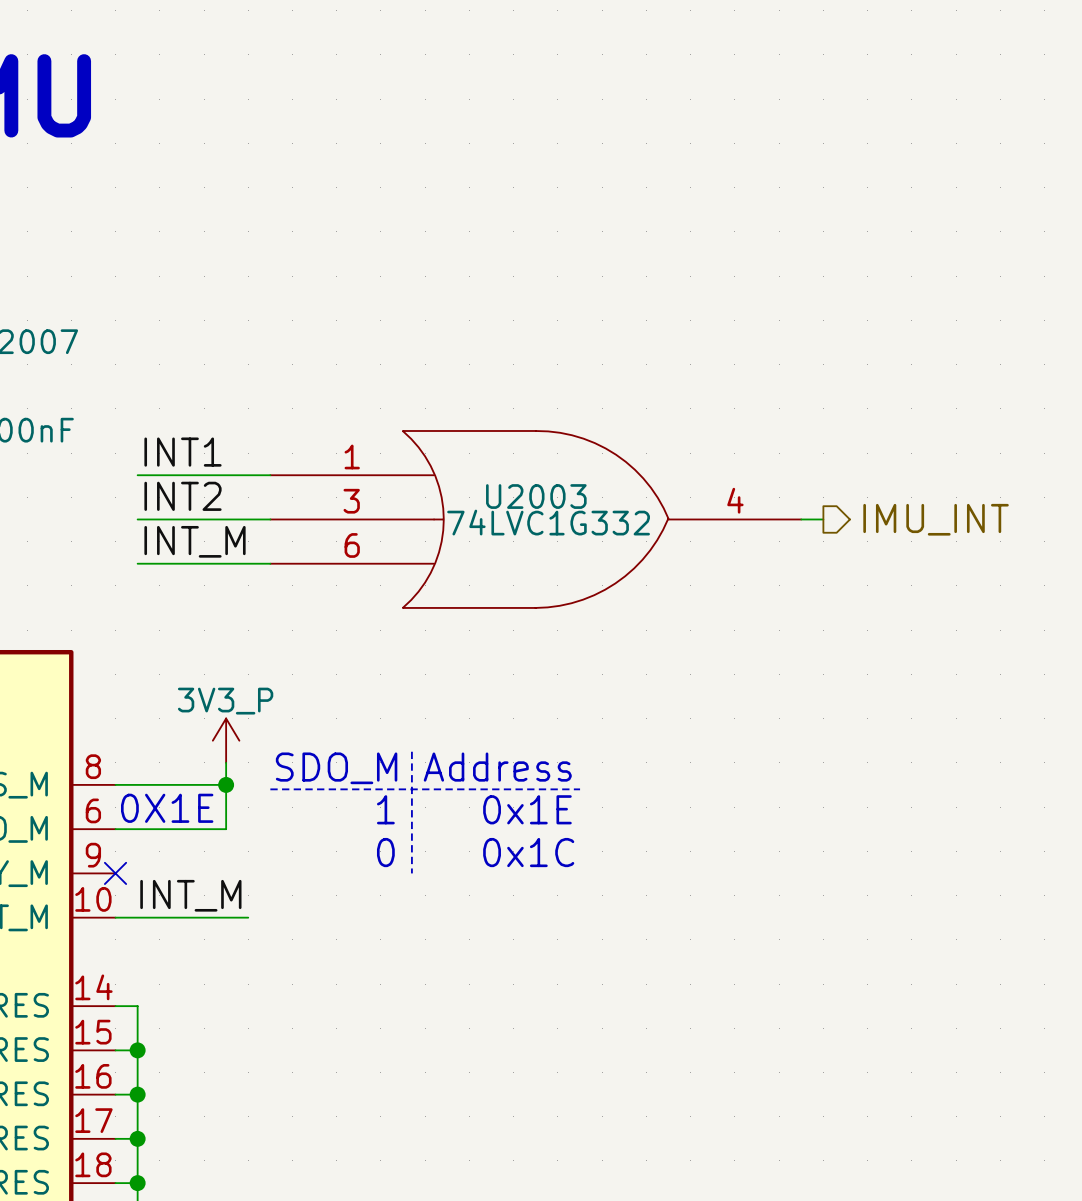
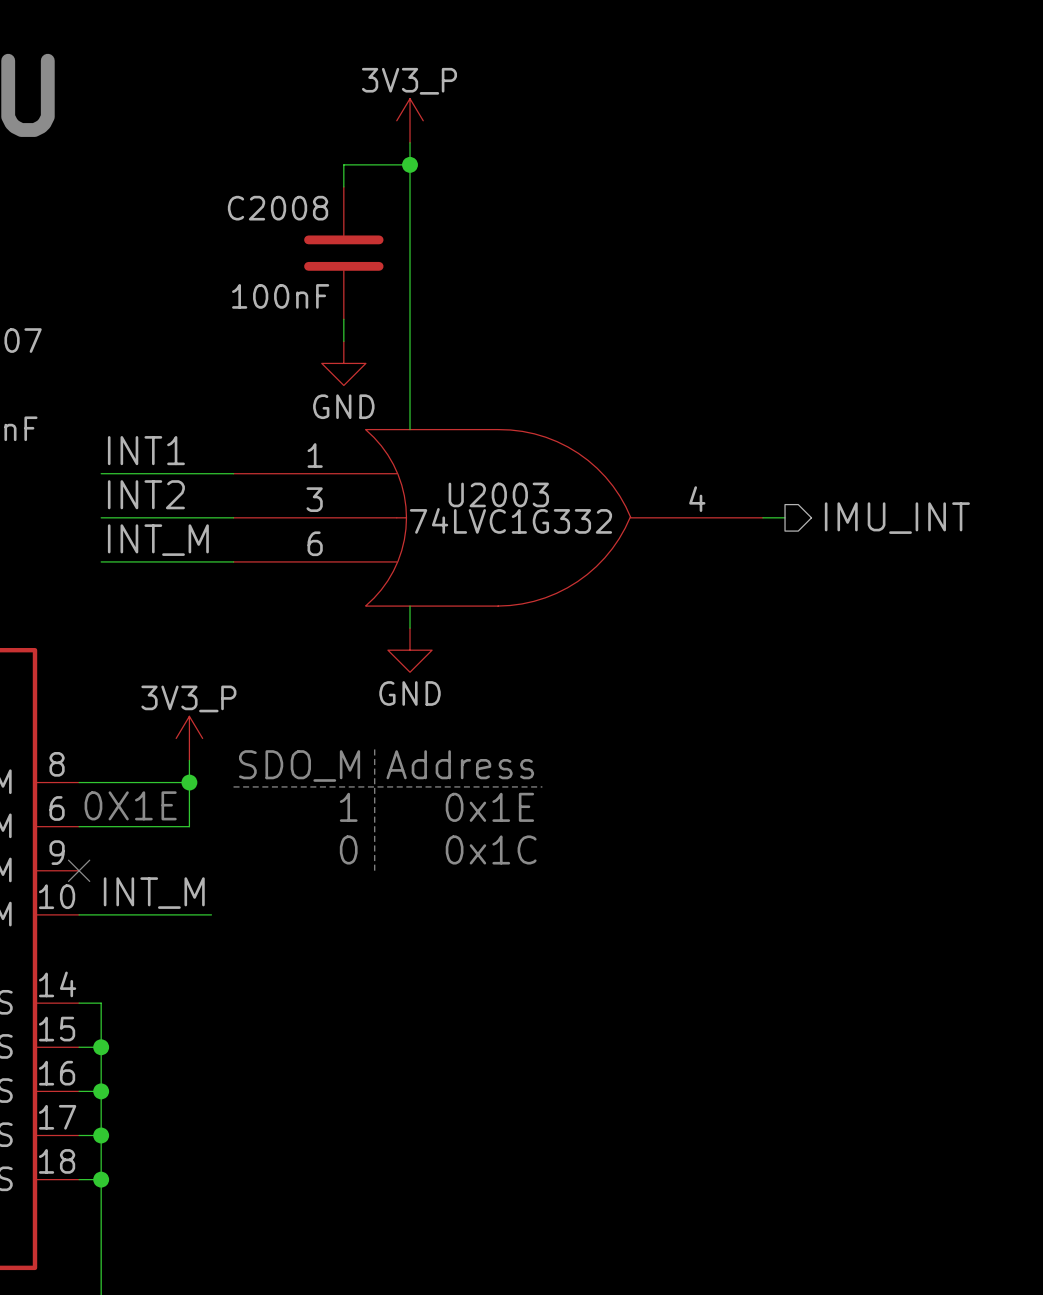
power symbol: none -> 3V3_P (410, 120)
wire: none -> (410, 142) (410, 429)
wire: none -> (410, 164) (343, 164) (343, 186)
junction: none -> (410, 164)
C2008: none -> 100nF (343, 253)
wire: none -> (343, 319) (343, 341)
power symbol: none -> GND (343, 363)
wire: none -> (410, 606) (410, 628)
power symbol: none -> GND (410, 650)

